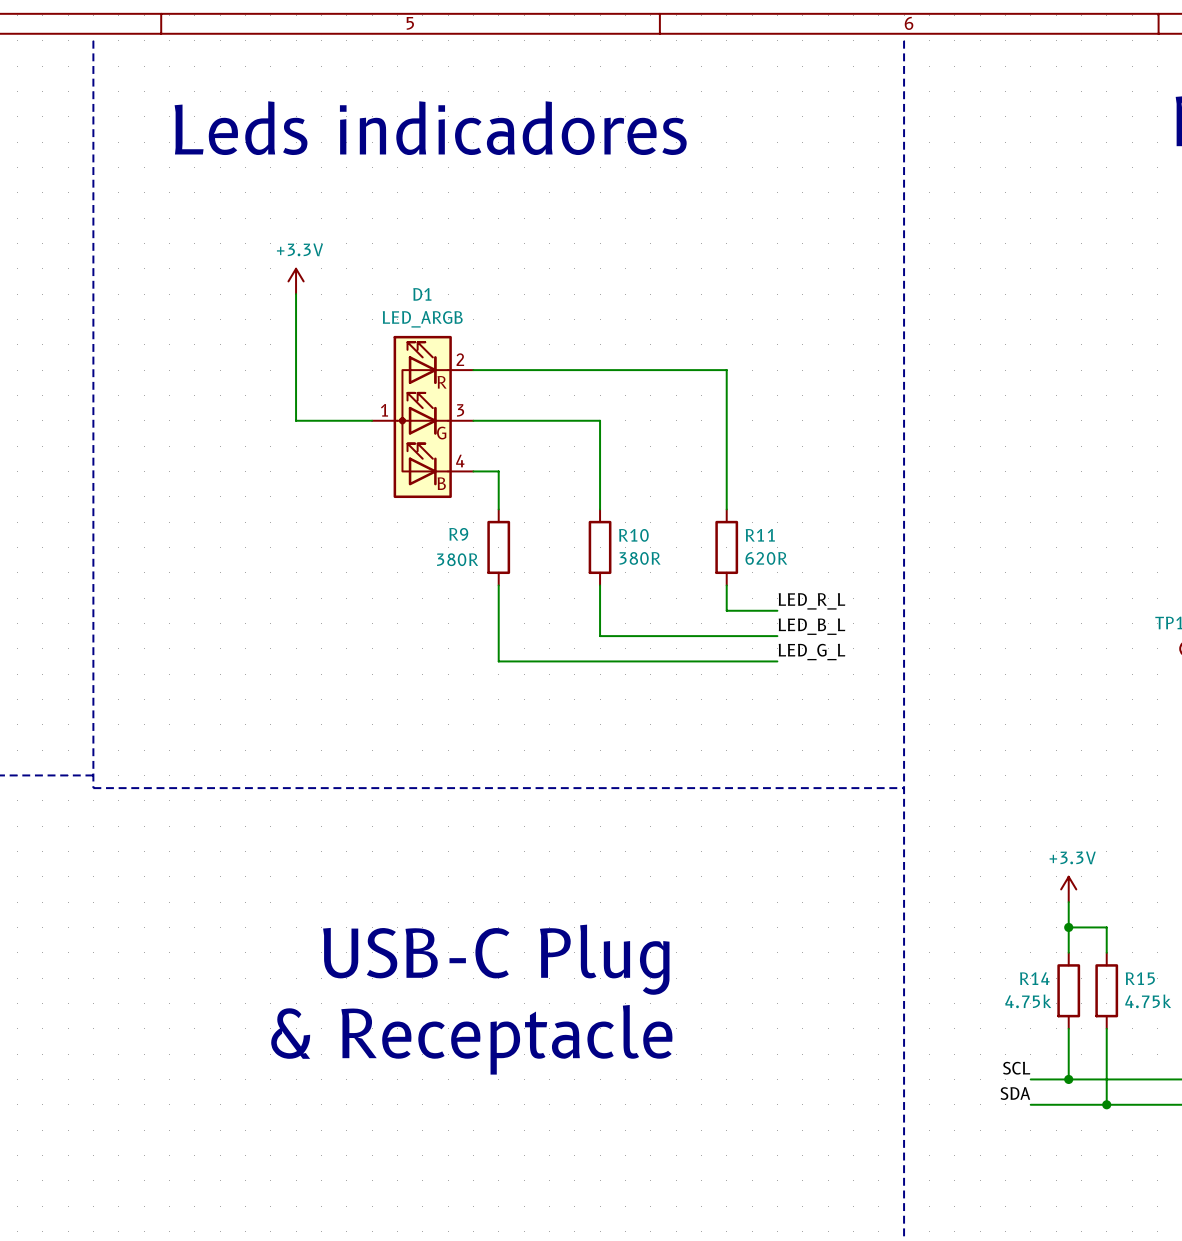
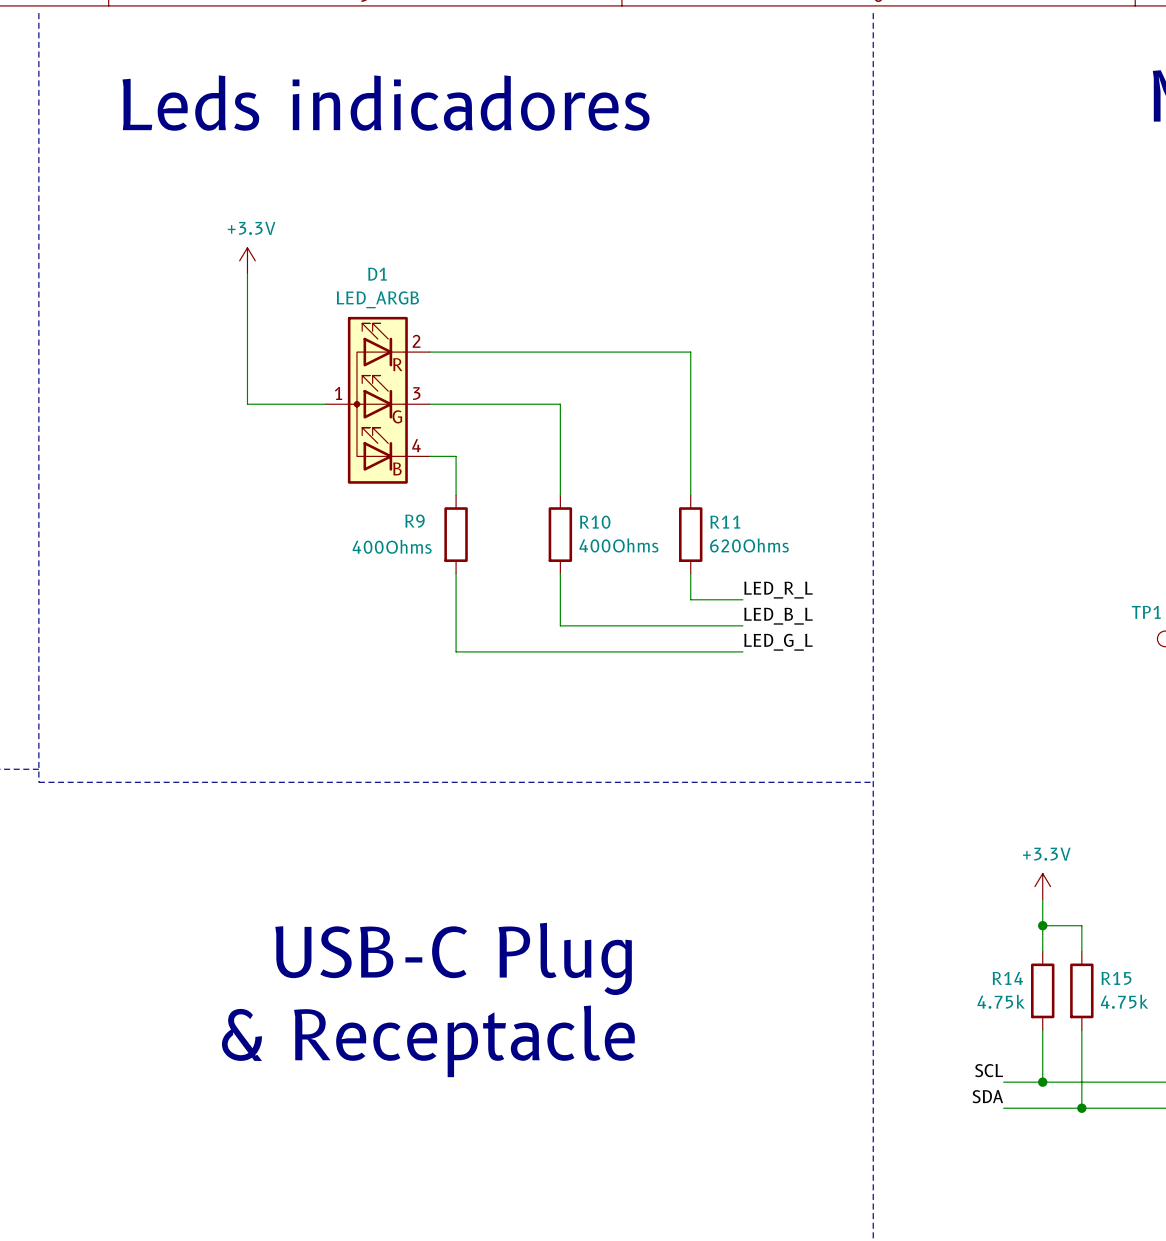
R10 value: 380R (640, 558) -> 400Ohms (618, 545)
R11 value: 620R (766, 558) -> 620Ohms (749, 545)
R9 value: 380R (457, 559) -> 400Ohms (392, 546)

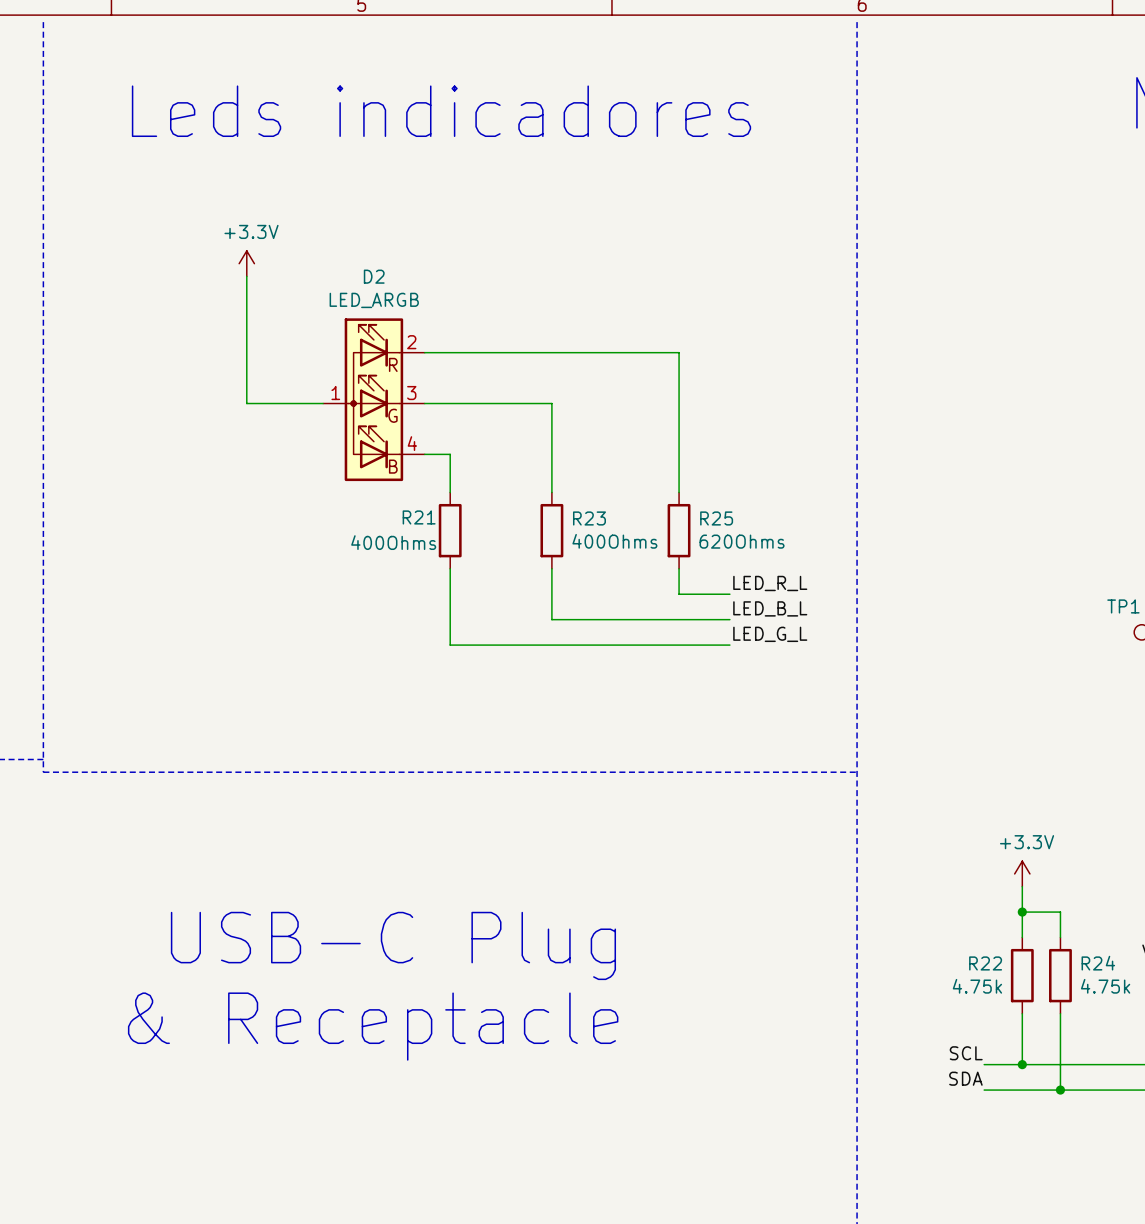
D1 name: D1 (377, 274) -> D2 (374, 276)
R9 name: R9 (414, 521) -> R21 (419, 517)
R10 name: R10 (595, 522) -> R23 (589, 518)
R11 name: R11 (725, 522) -> R25 (716, 518)
R14 name: R14 (1007, 978) -> R22 (985, 963)
R15 name: R15 (1116, 978) -> R24 (1098, 963)

